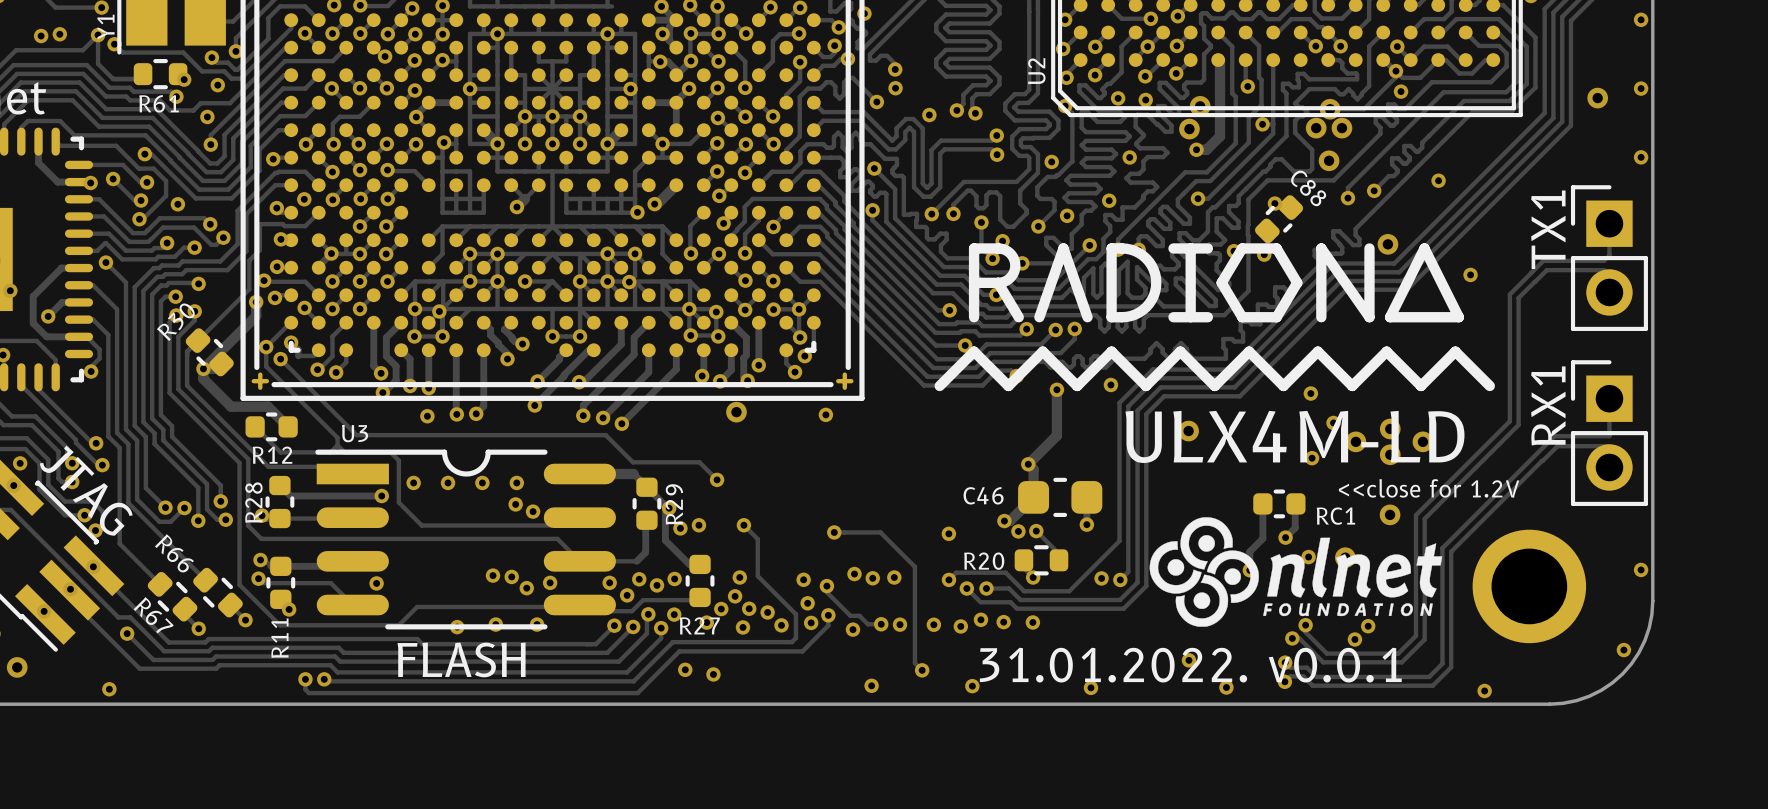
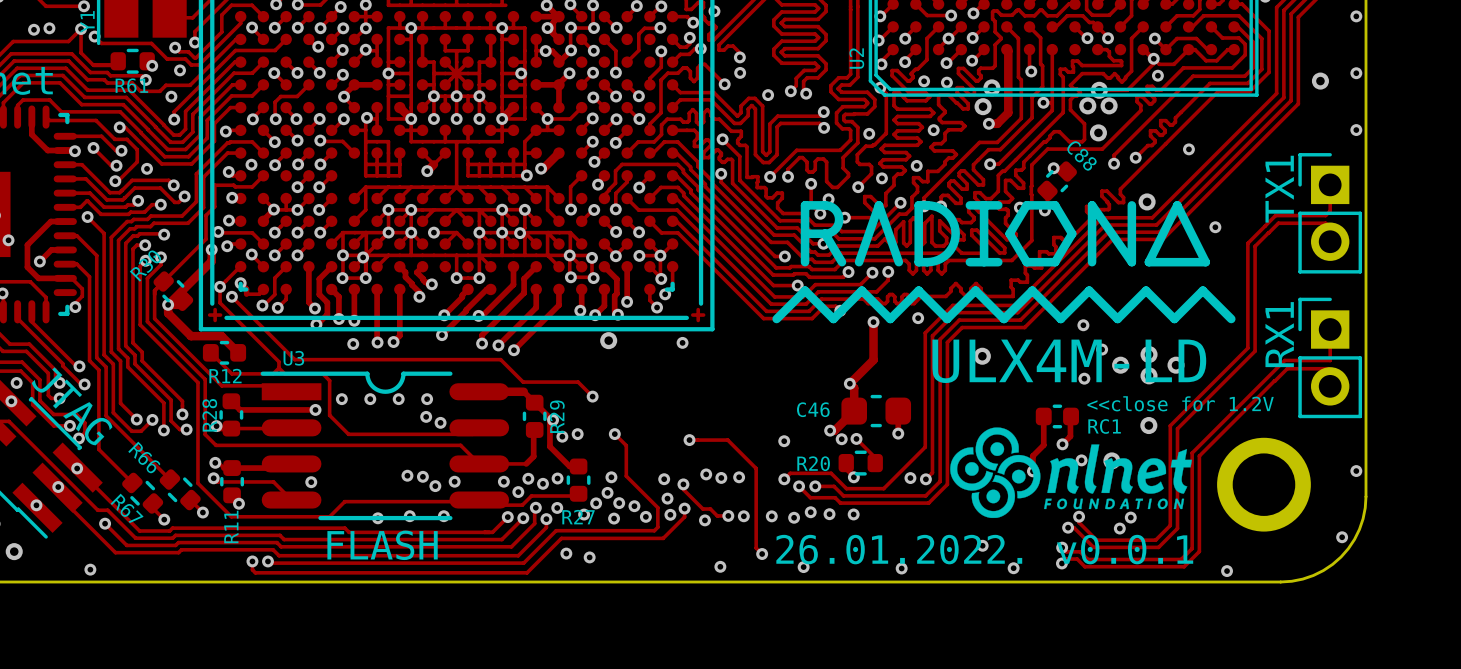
text: 31.01.2022. v0.0.1 (1190, 665) -> 26.01.2022. v0.0.1 (984, 549)

